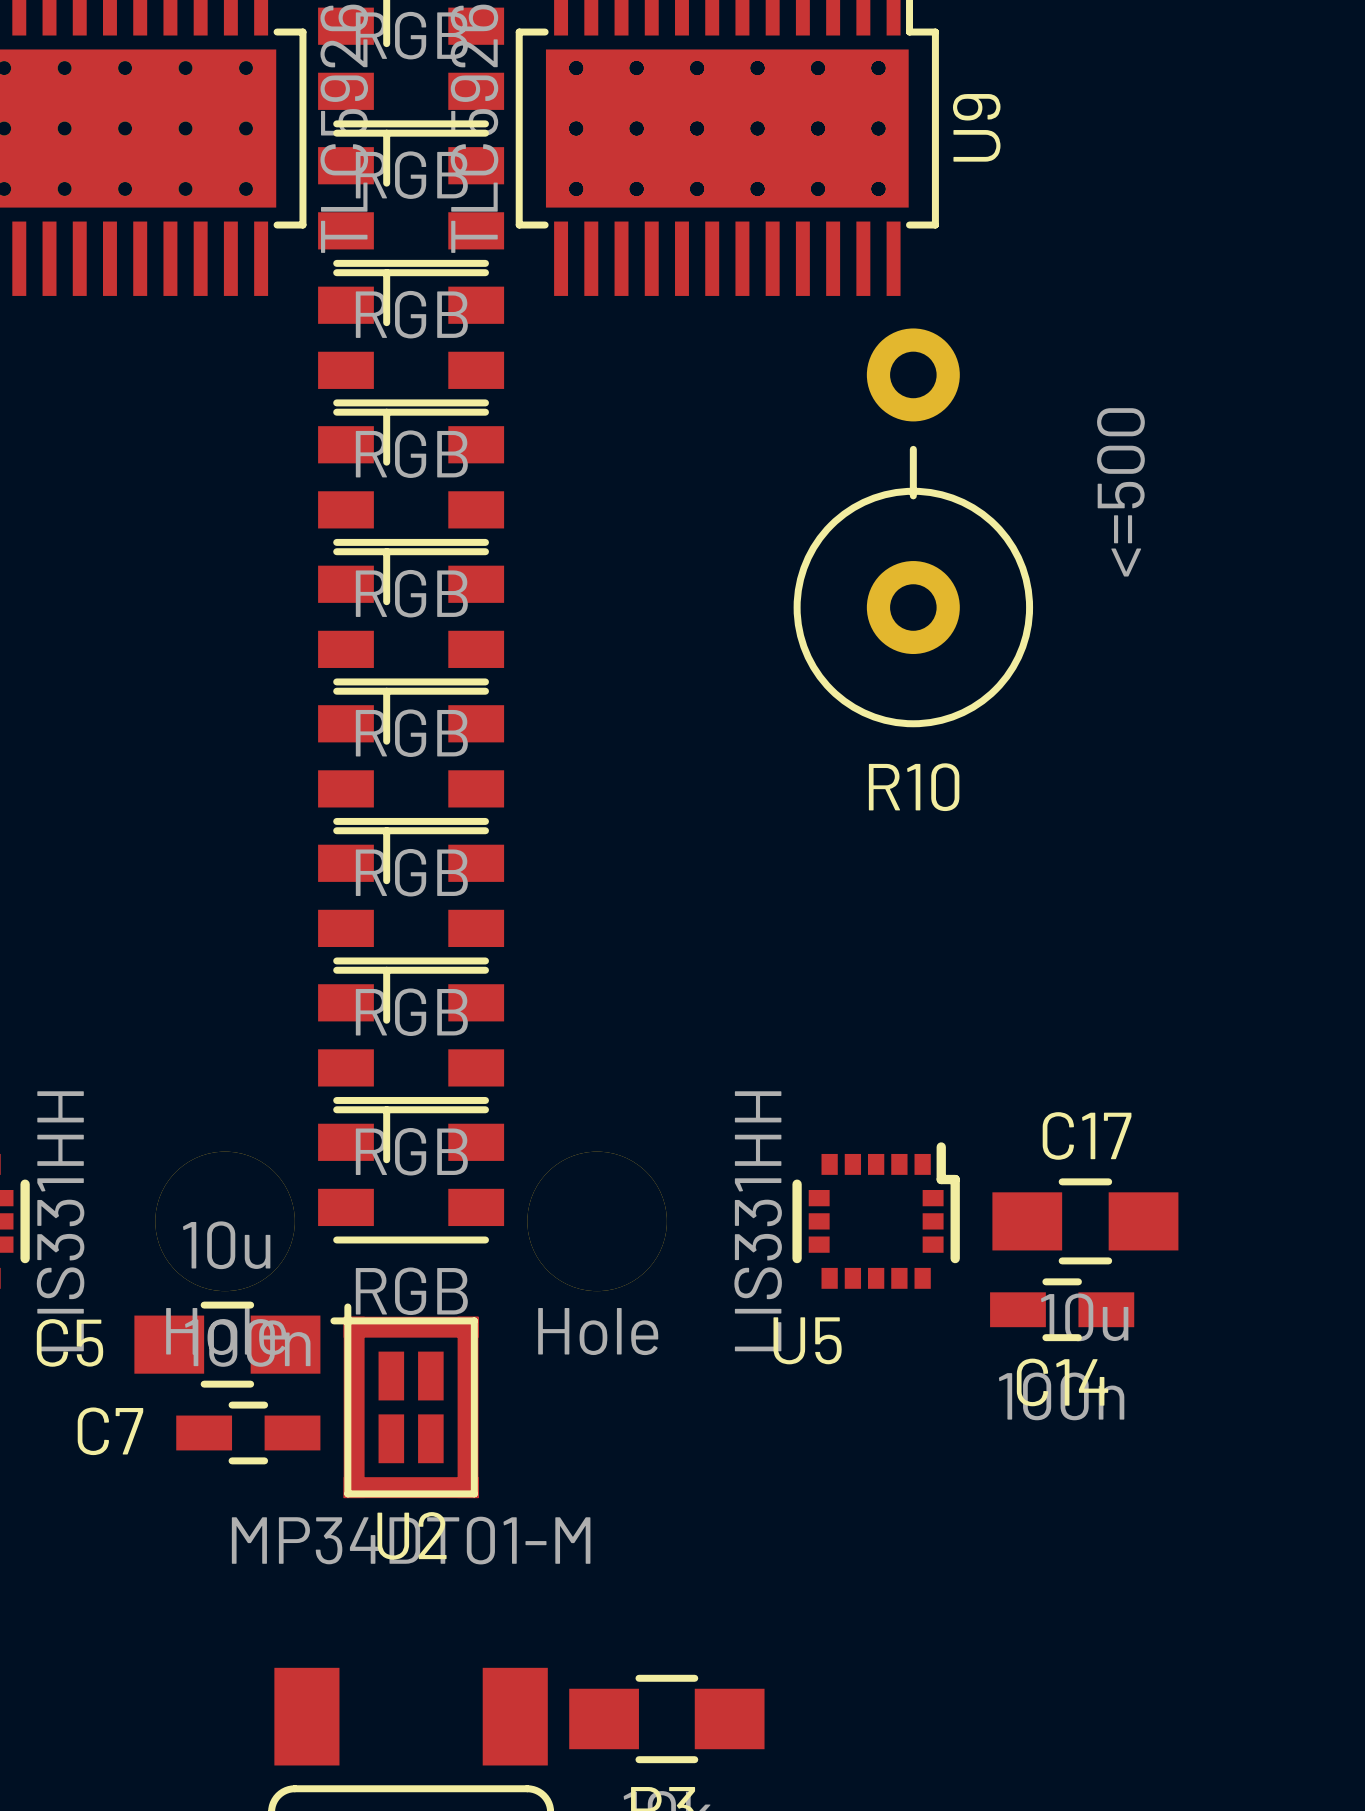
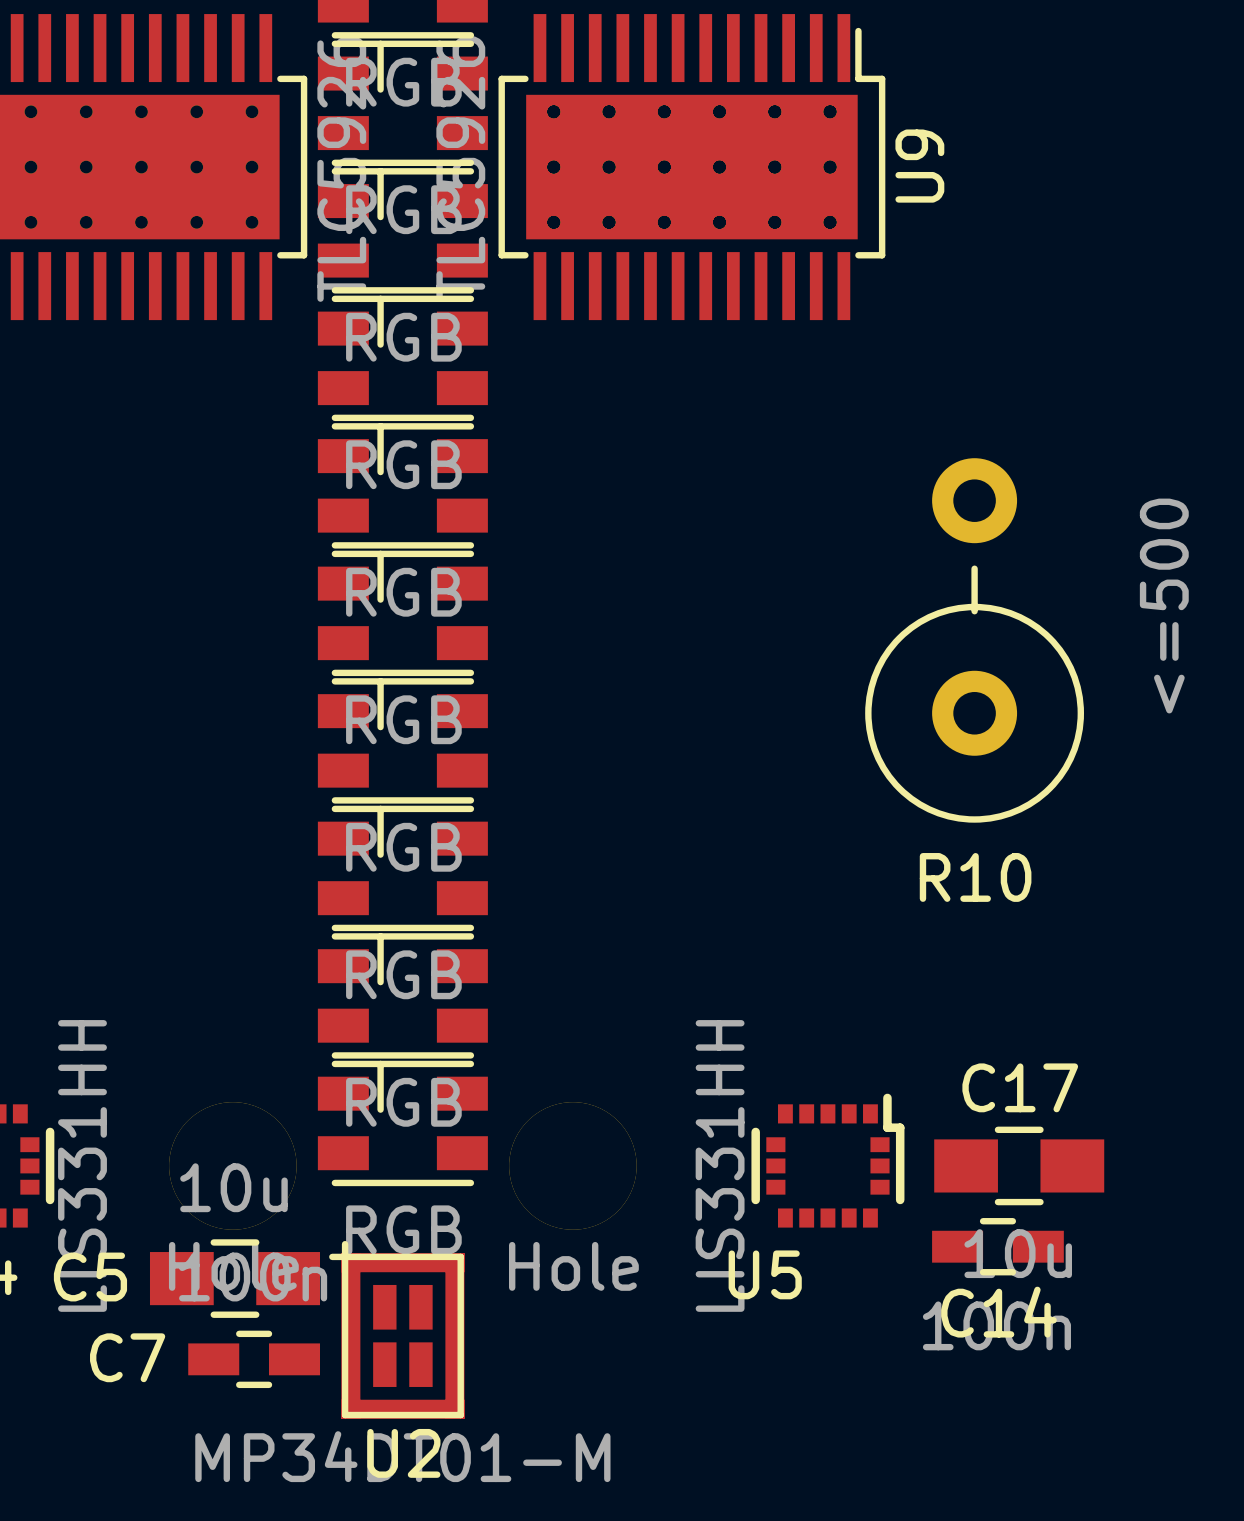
R10 position: (913, 527) -> (974, 640)

